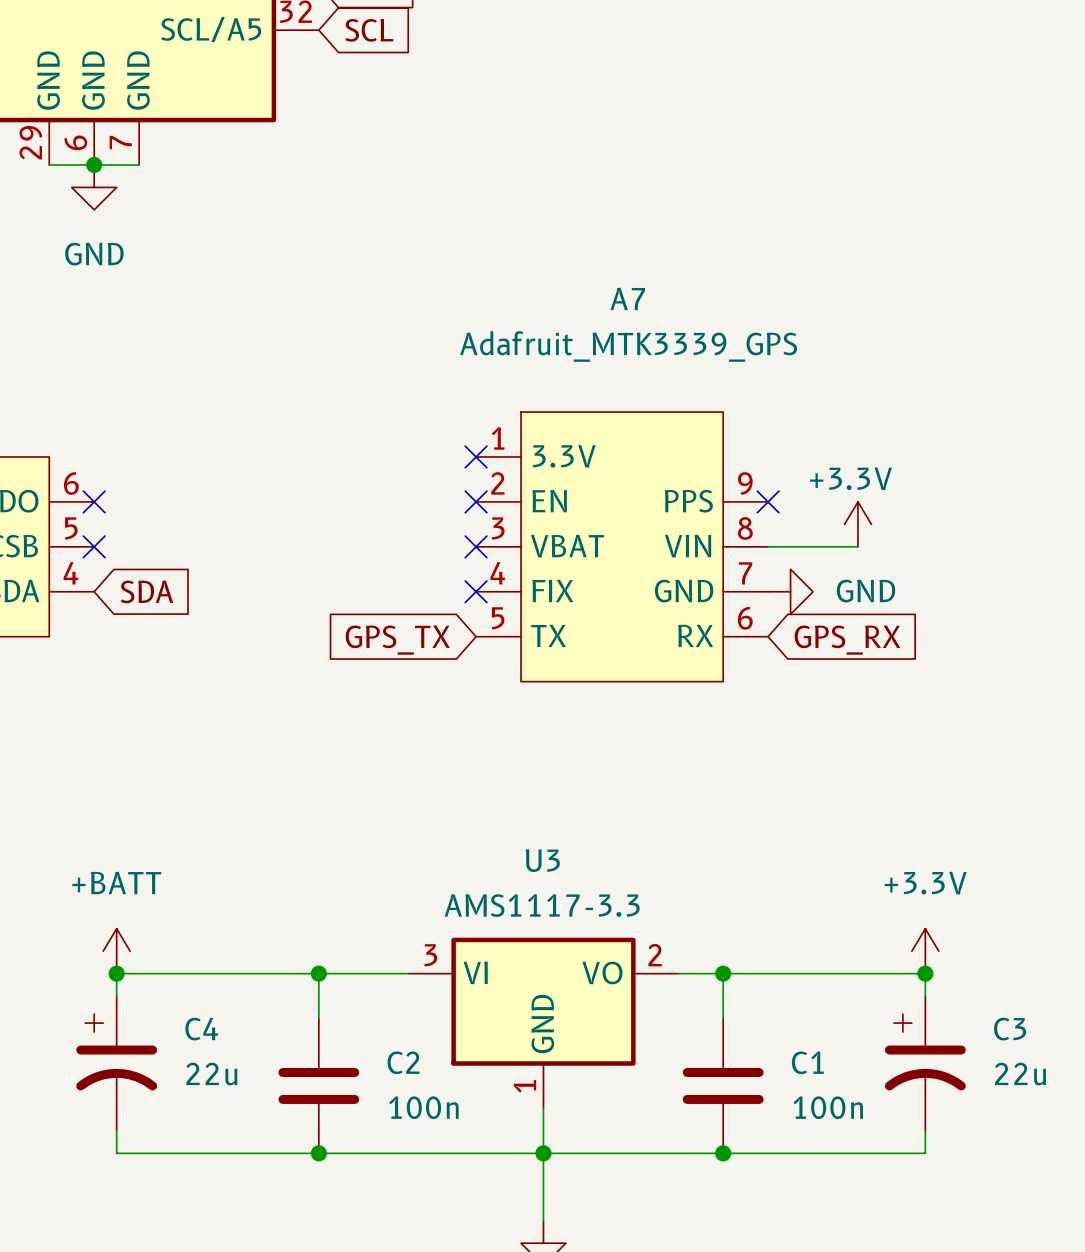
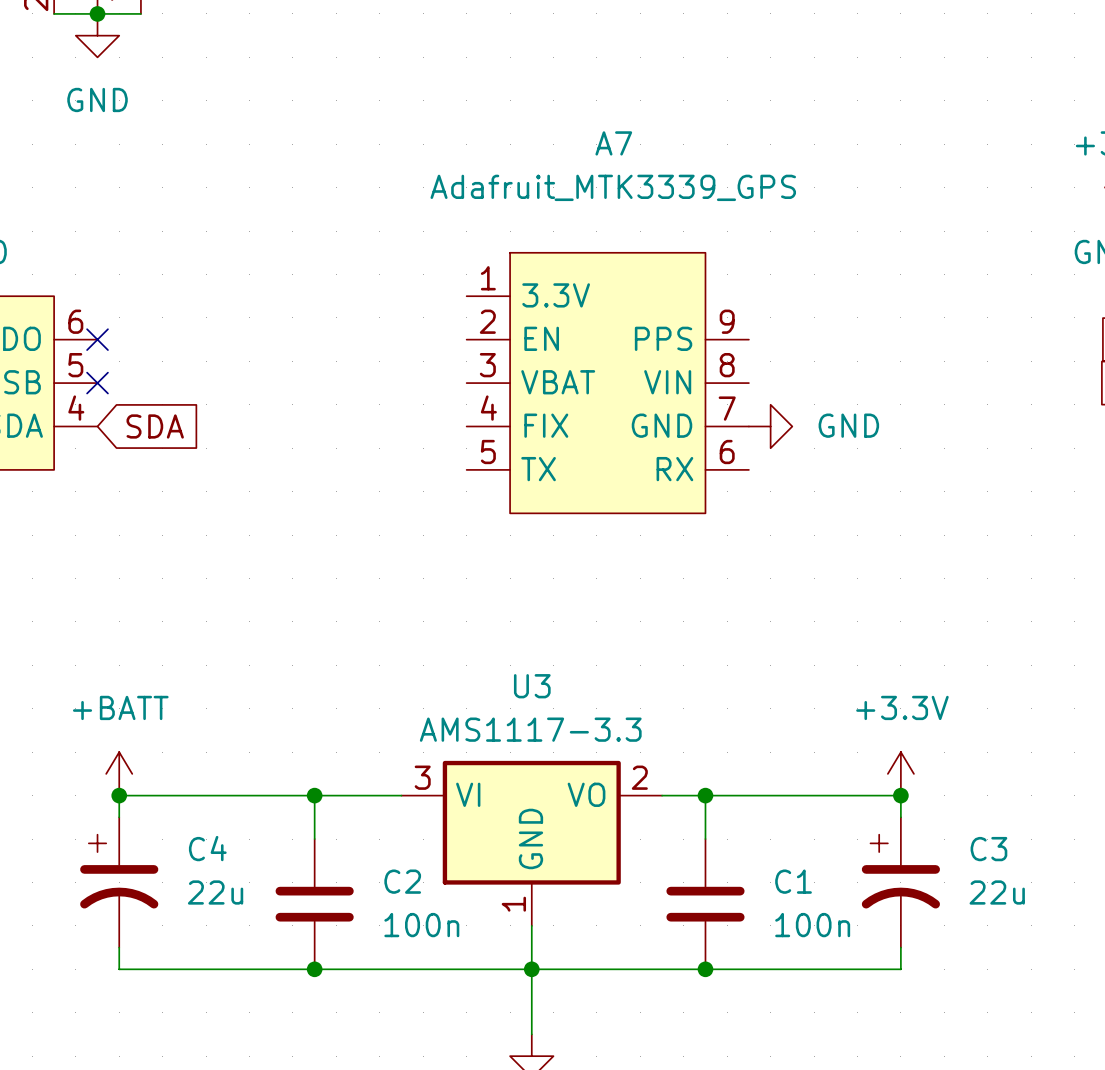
no-connect mark: (476, 456) -> none
no-connect mark: (476, 501) -> none
no-connect mark: (768, 501) -> none
power symbol: +3.3V (857, 524) -> none
no-connect mark: (476, 546) -> none
wire: (768, 546) (857, 546) -> none
no-connect mark: (476, 591) -> none
global label: GPS_TX (397, 640) -> none
global label: GPS_RX (847, 640) -> none

